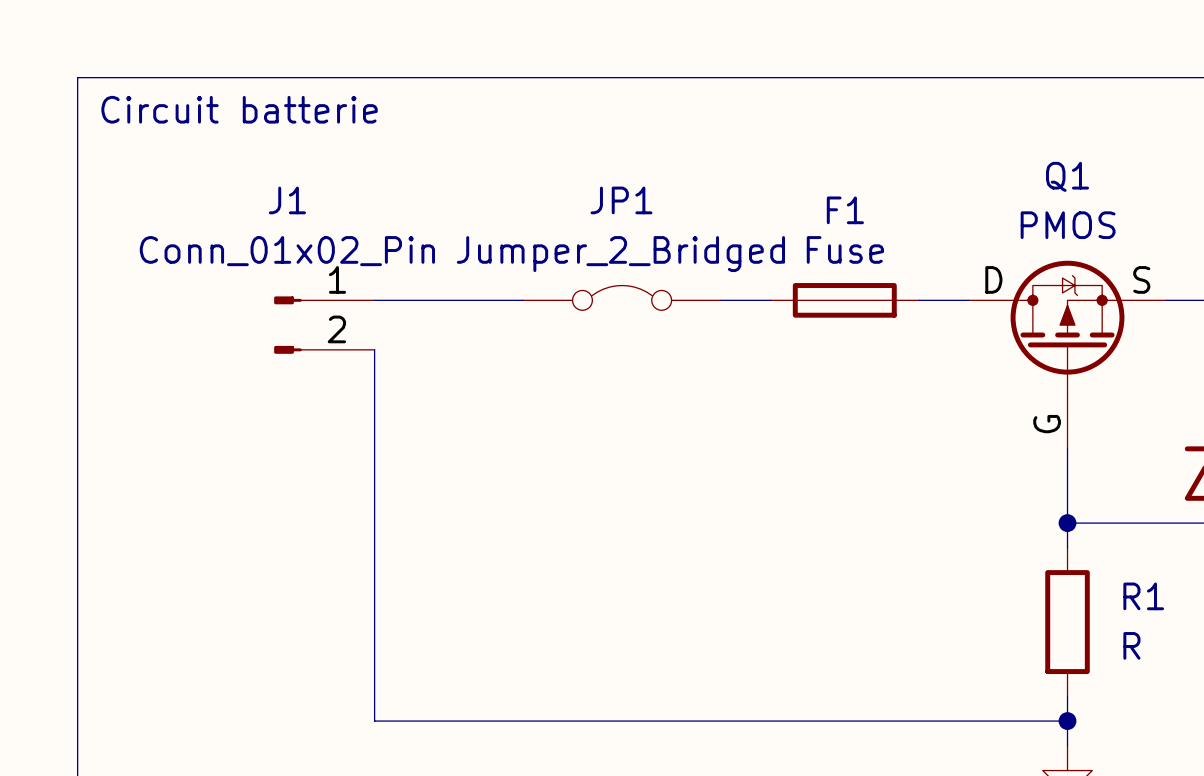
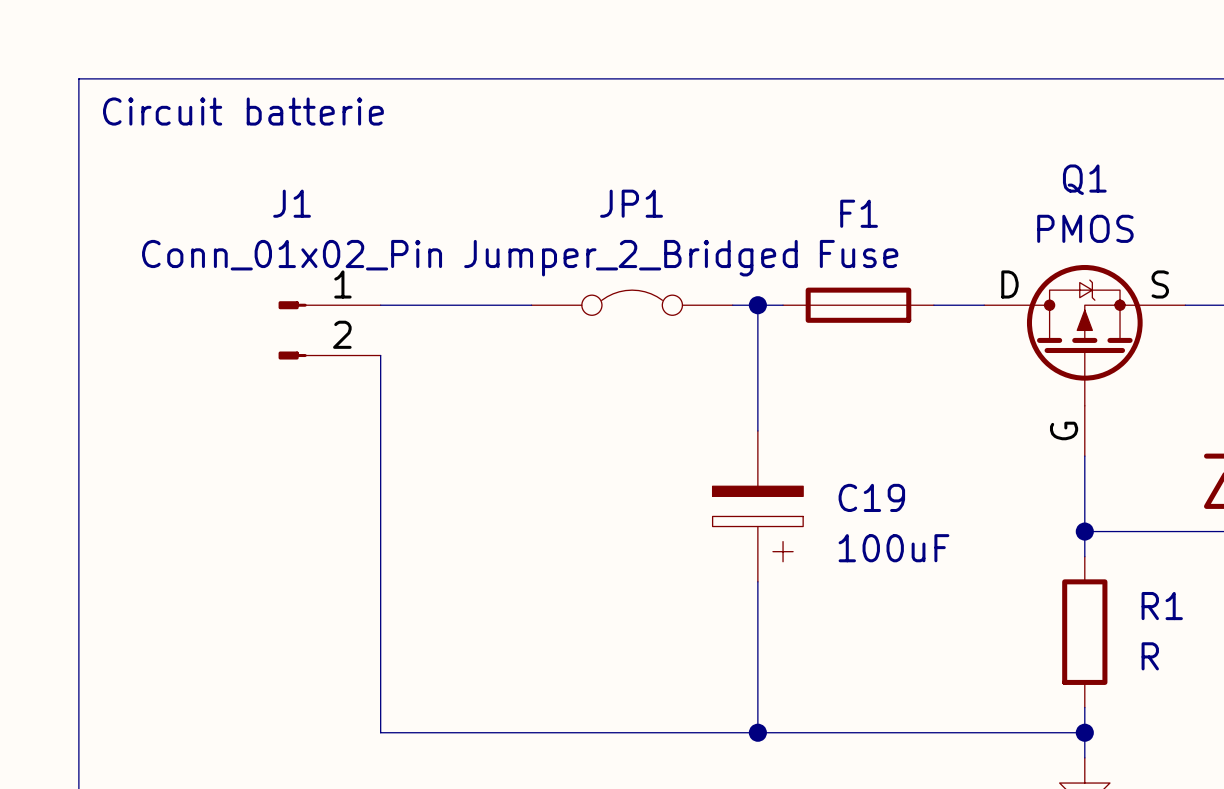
wire: none -> (757, 305) (757, 430)
junction: none -> (757, 305)
C19: none -> 100uF (757, 506)
wire: none -> (757, 581) (757, 732)
junction: none -> (757, 732)

